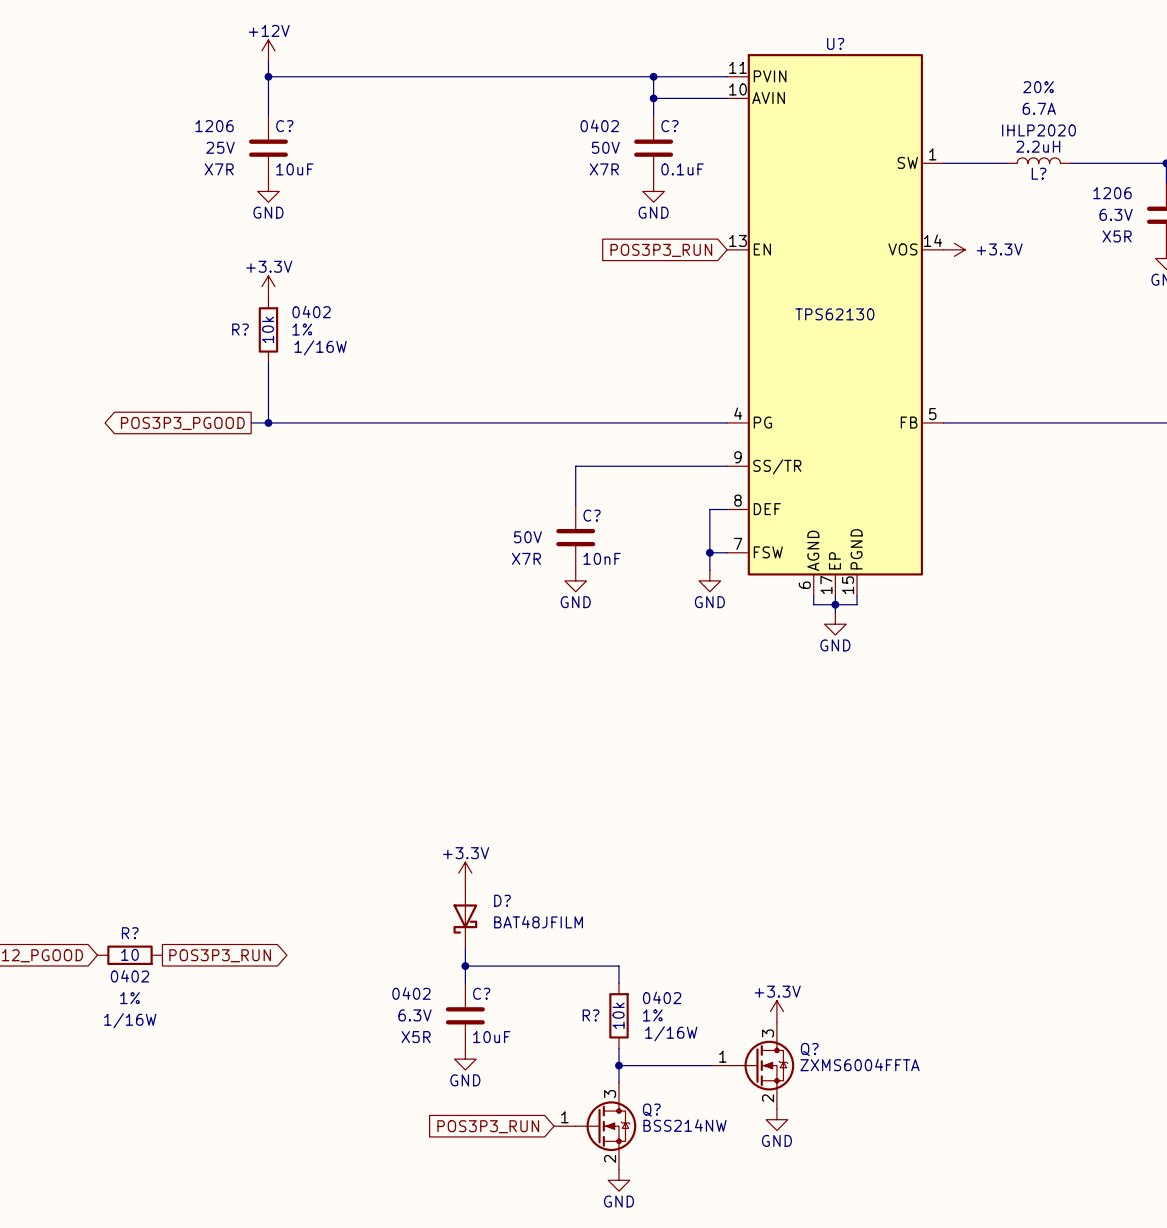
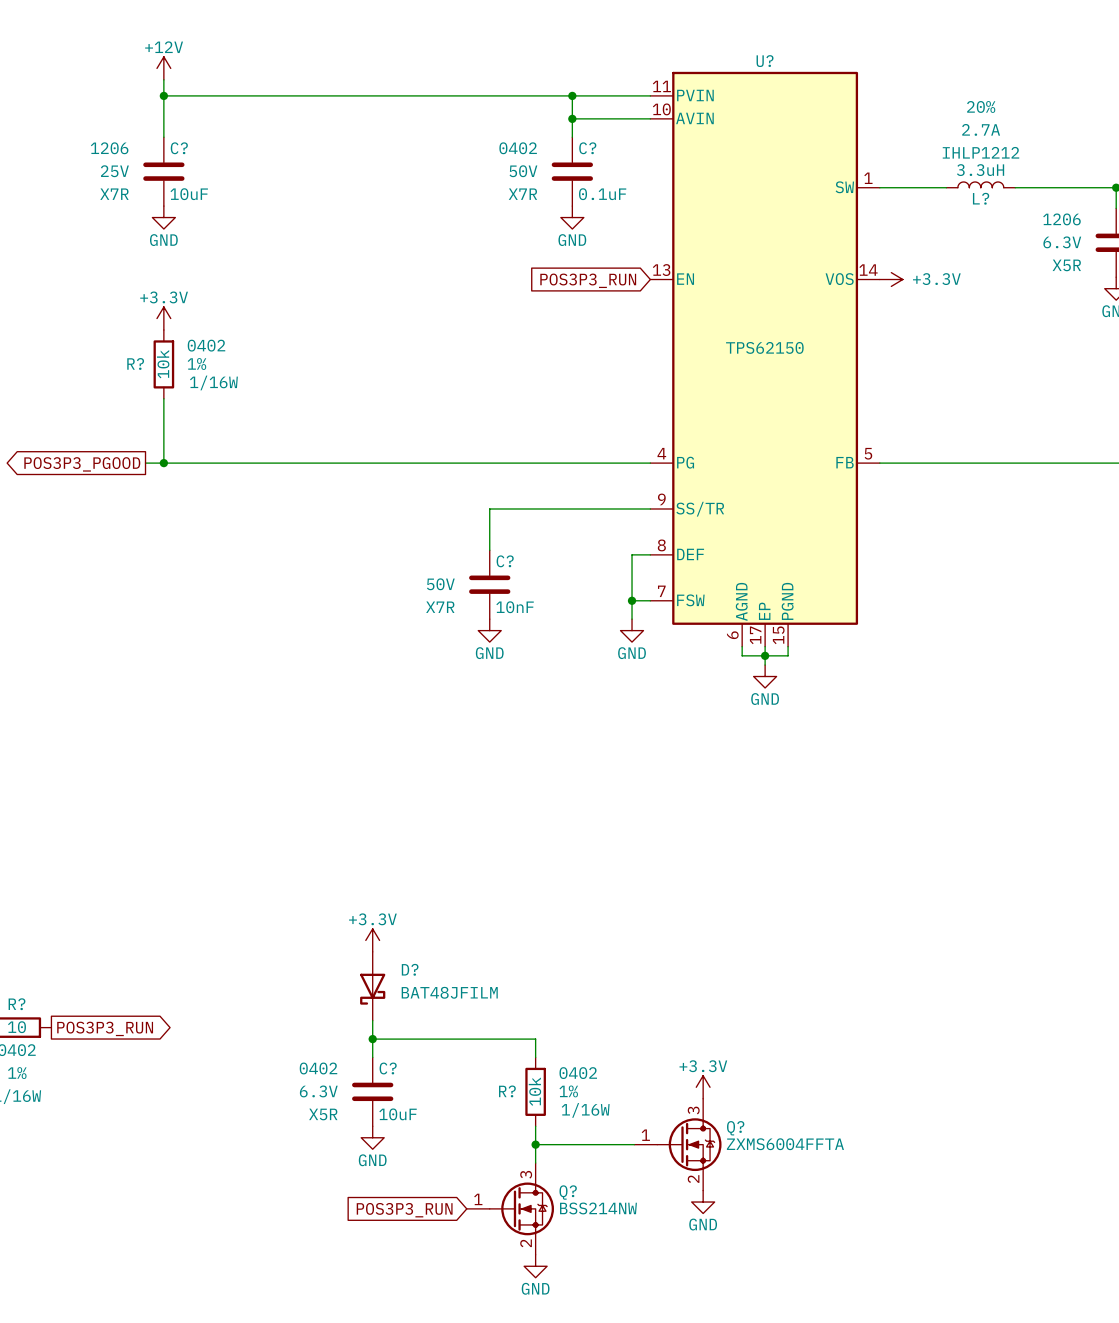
L? text: 6.7A (1039, 108) -> 2.7A (981, 129)
L? text: IHLP2020 (1039, 130) -> IHLP1212 (980, 152)
L? value: 2.2uH (1038, 146) -> 3.3uH (980, 170)
U? value: TPS62130 (834, 314) -> TPS62150 (764, 347)

